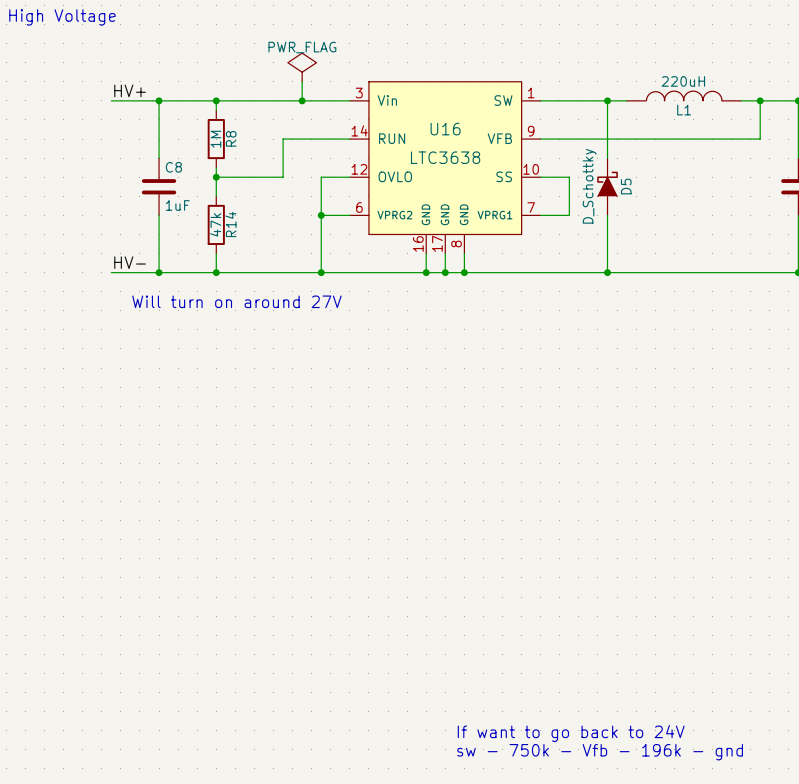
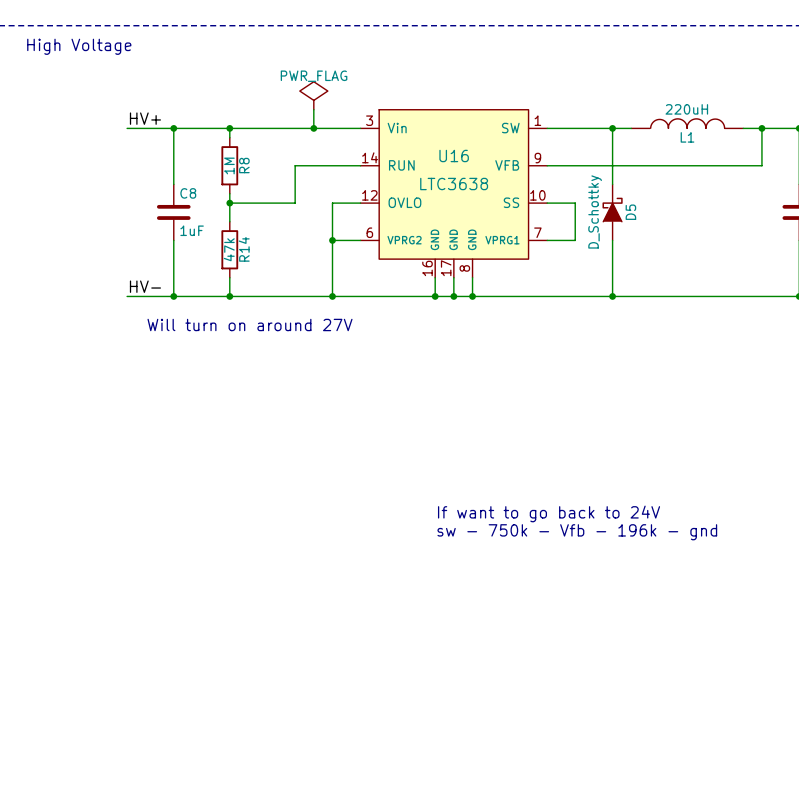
text: none -> If want to go back to 24V (549, 513)
text: none -> sw - 750k - Vfb - 196k - gnd (577, 532)
text: If want to go back to 24V (571, 733) -> none
text: sw - 750k - Vfb - 196k - gnd (600, 752) -> none

